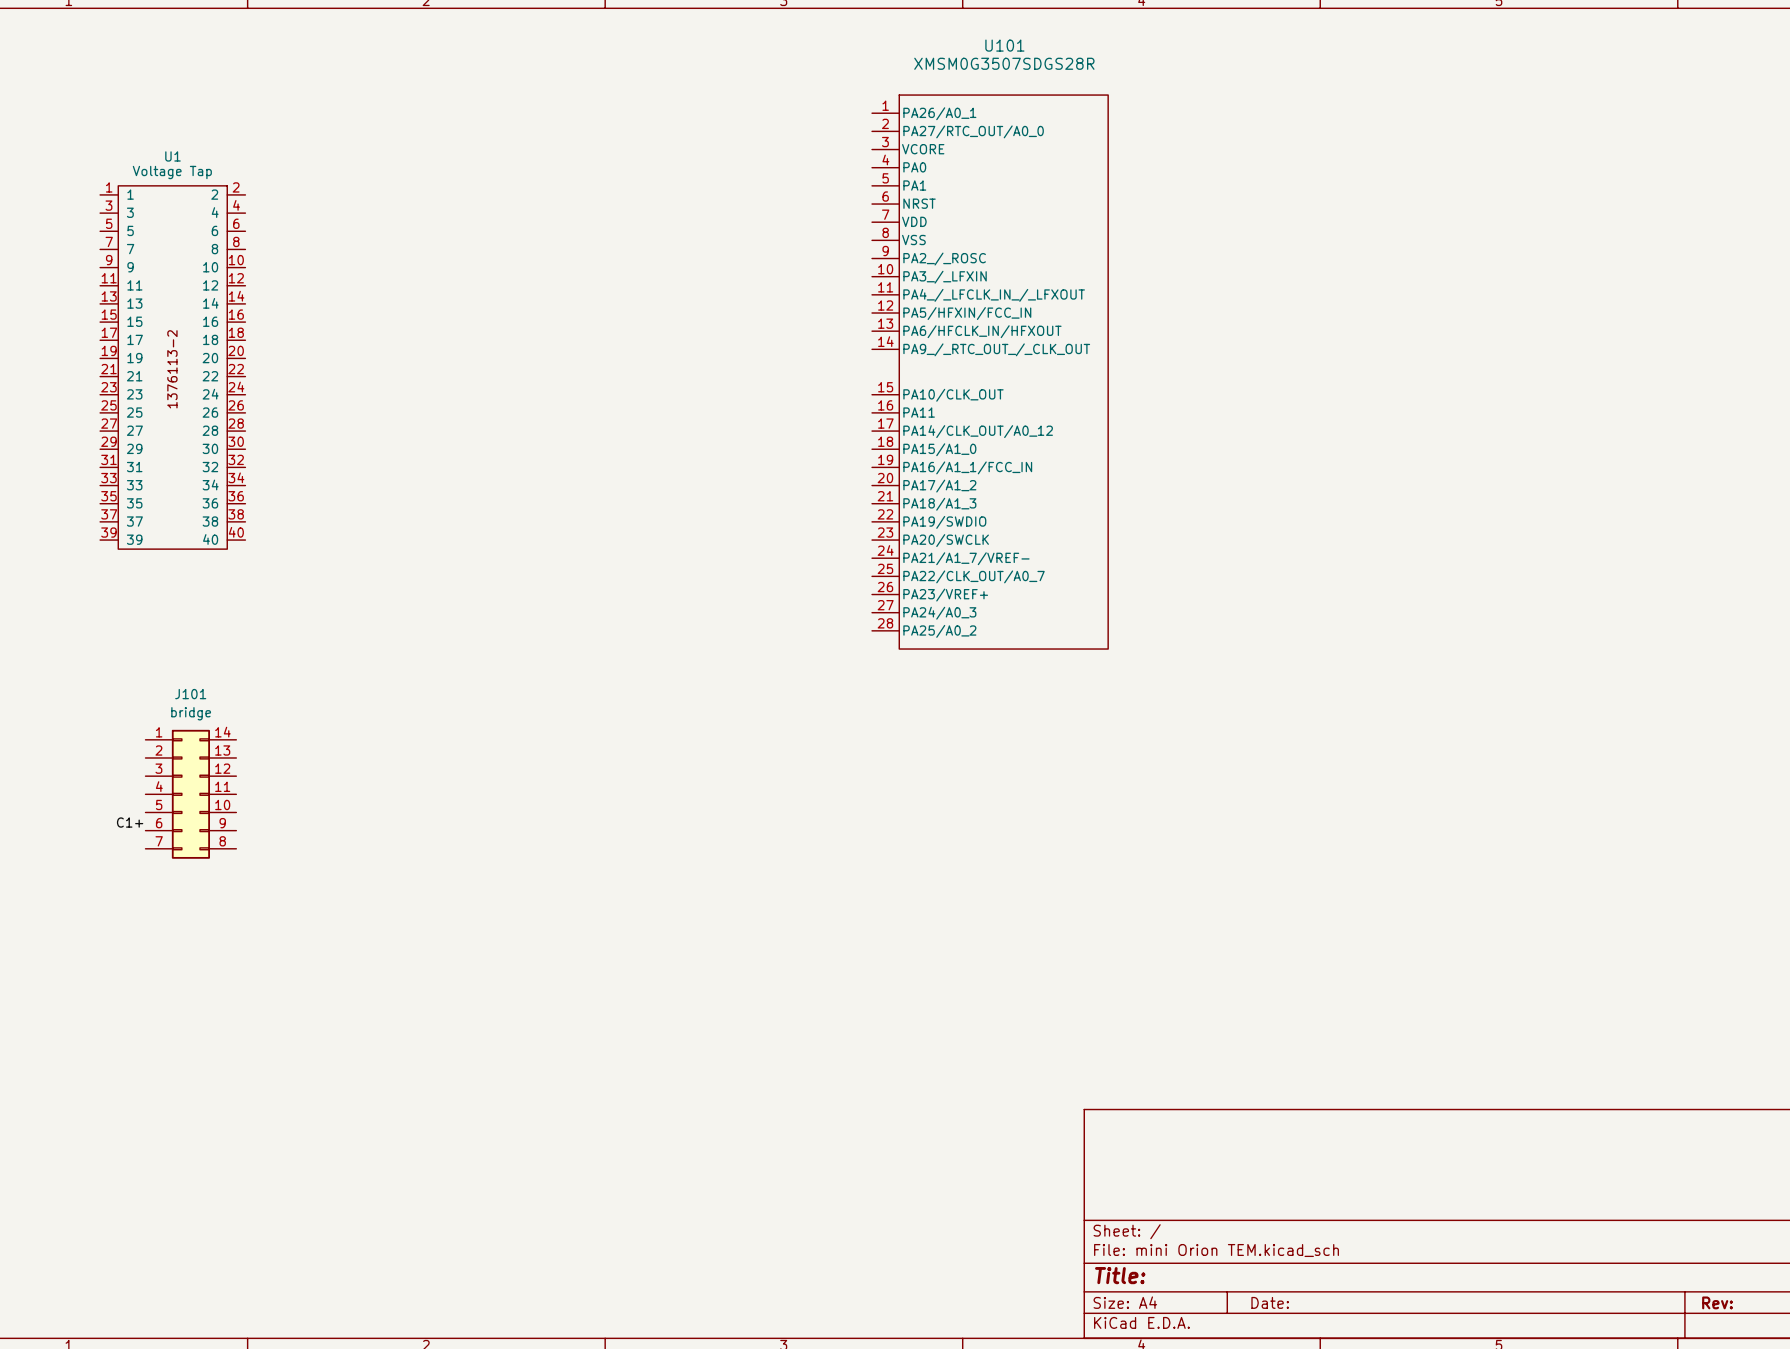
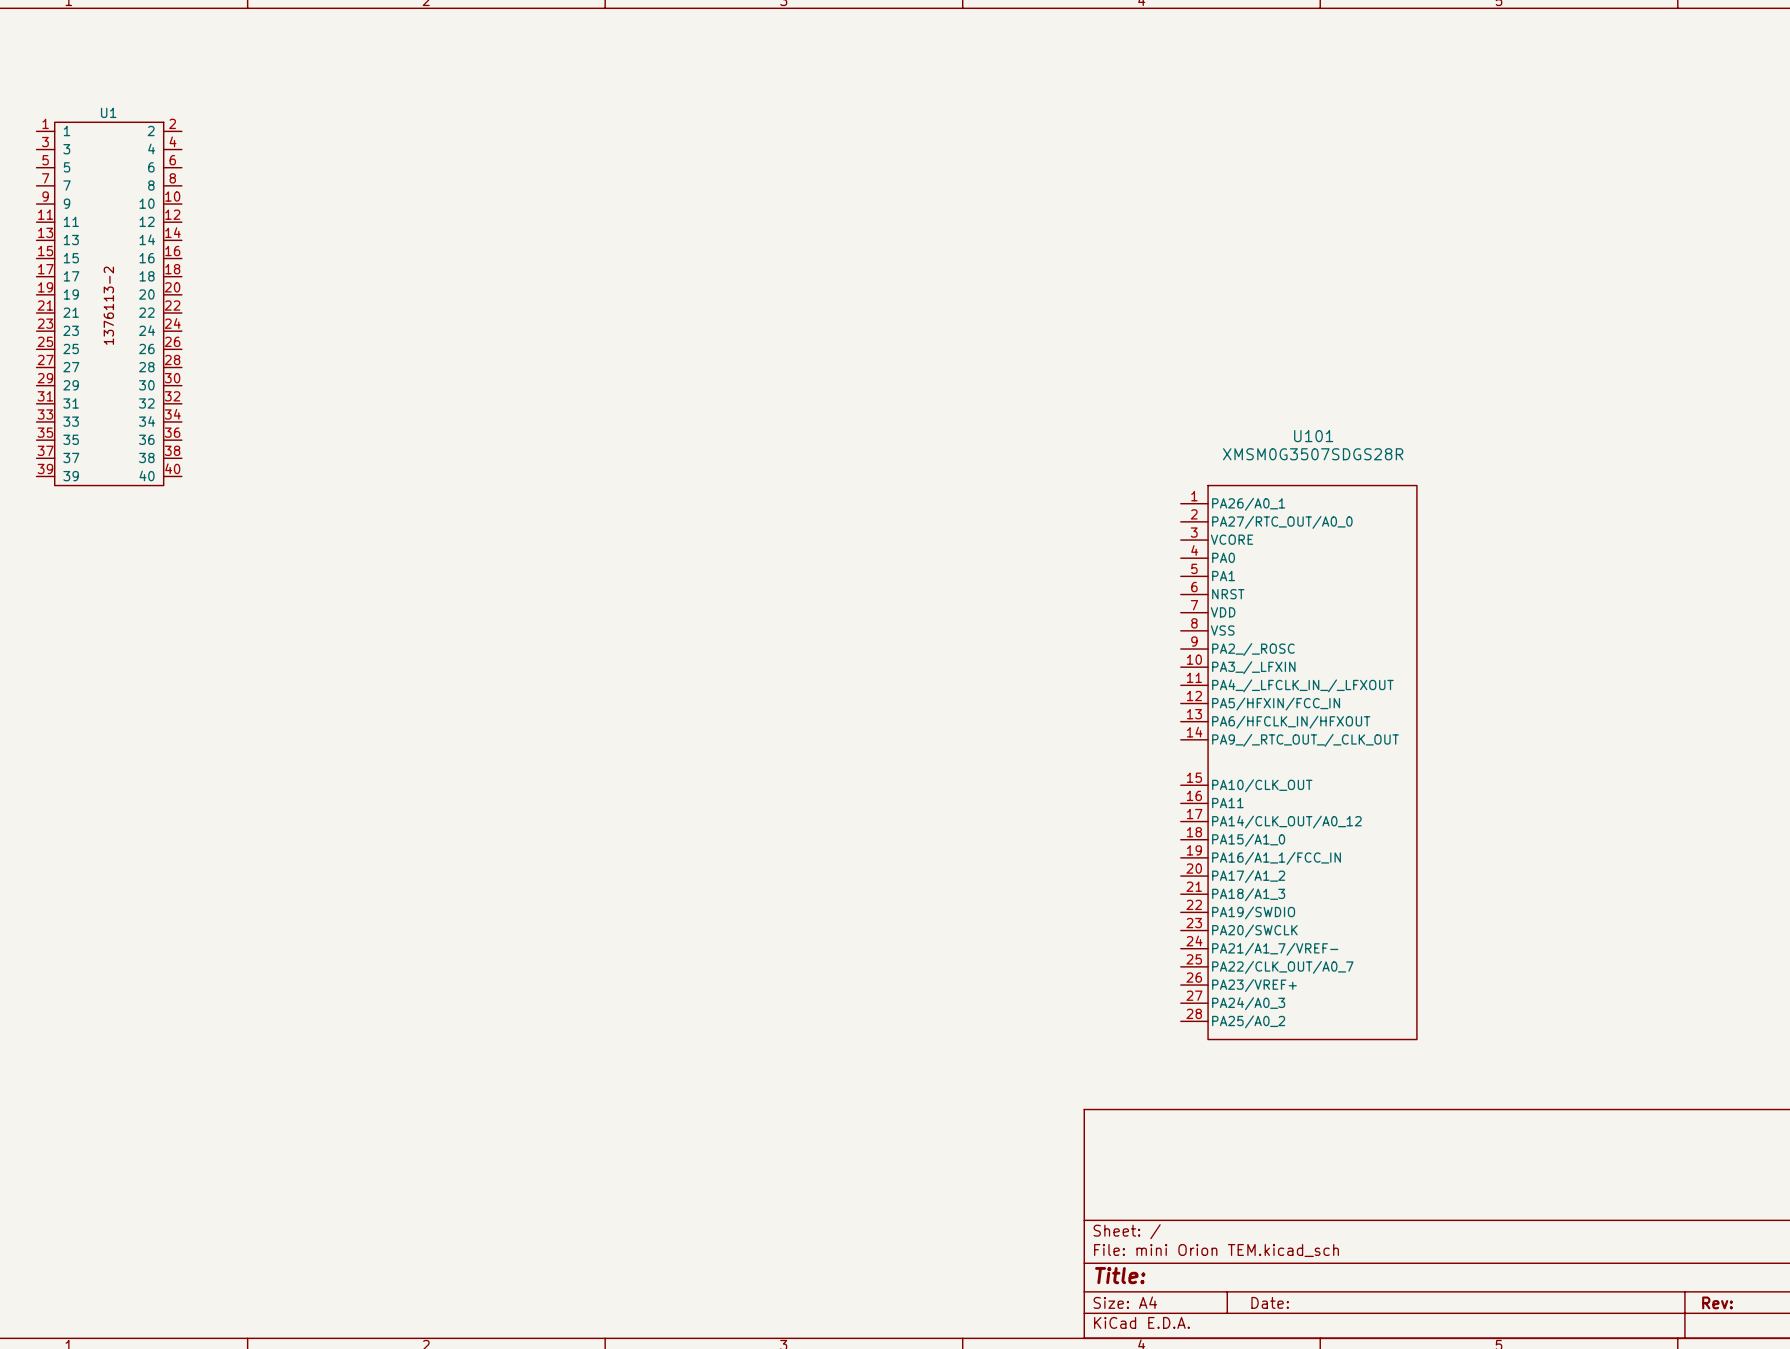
U1 name position: U1 (172, 156) -> U1 (108, 112)
U1 value: Voltage Tap (172, 172) -> none
U1 position: (172, 367) -> (109, 303)
U101 position: (990, 372) -> (1298, 762)
J101: bridge (190, 794) -> none
label: C1+ (130, 822) -> none

